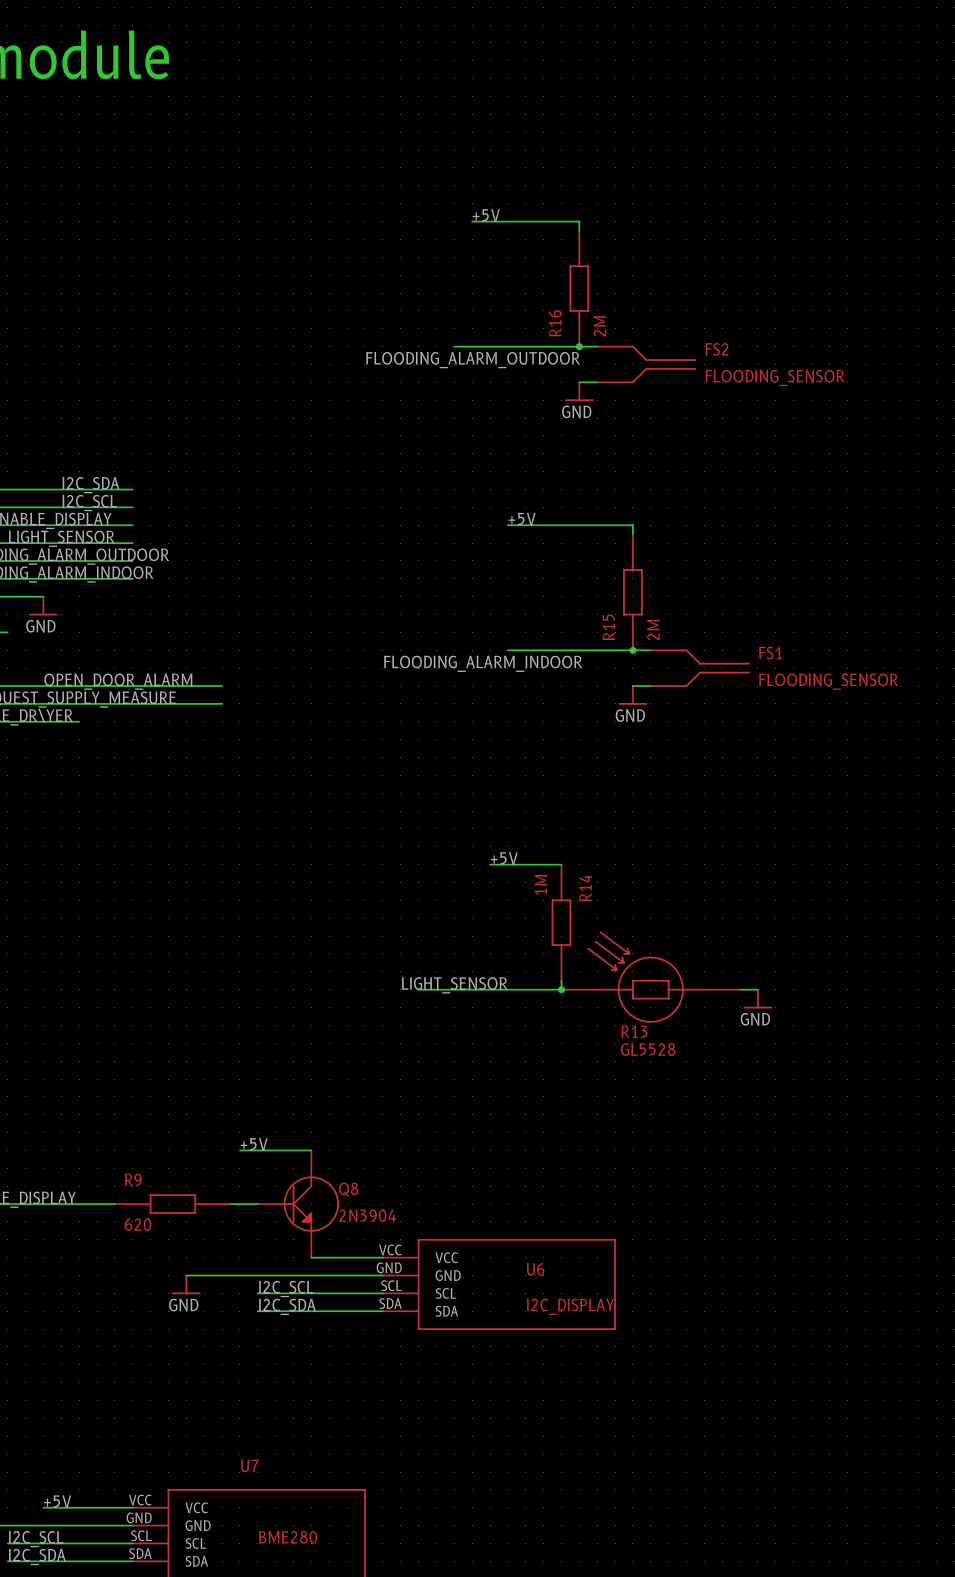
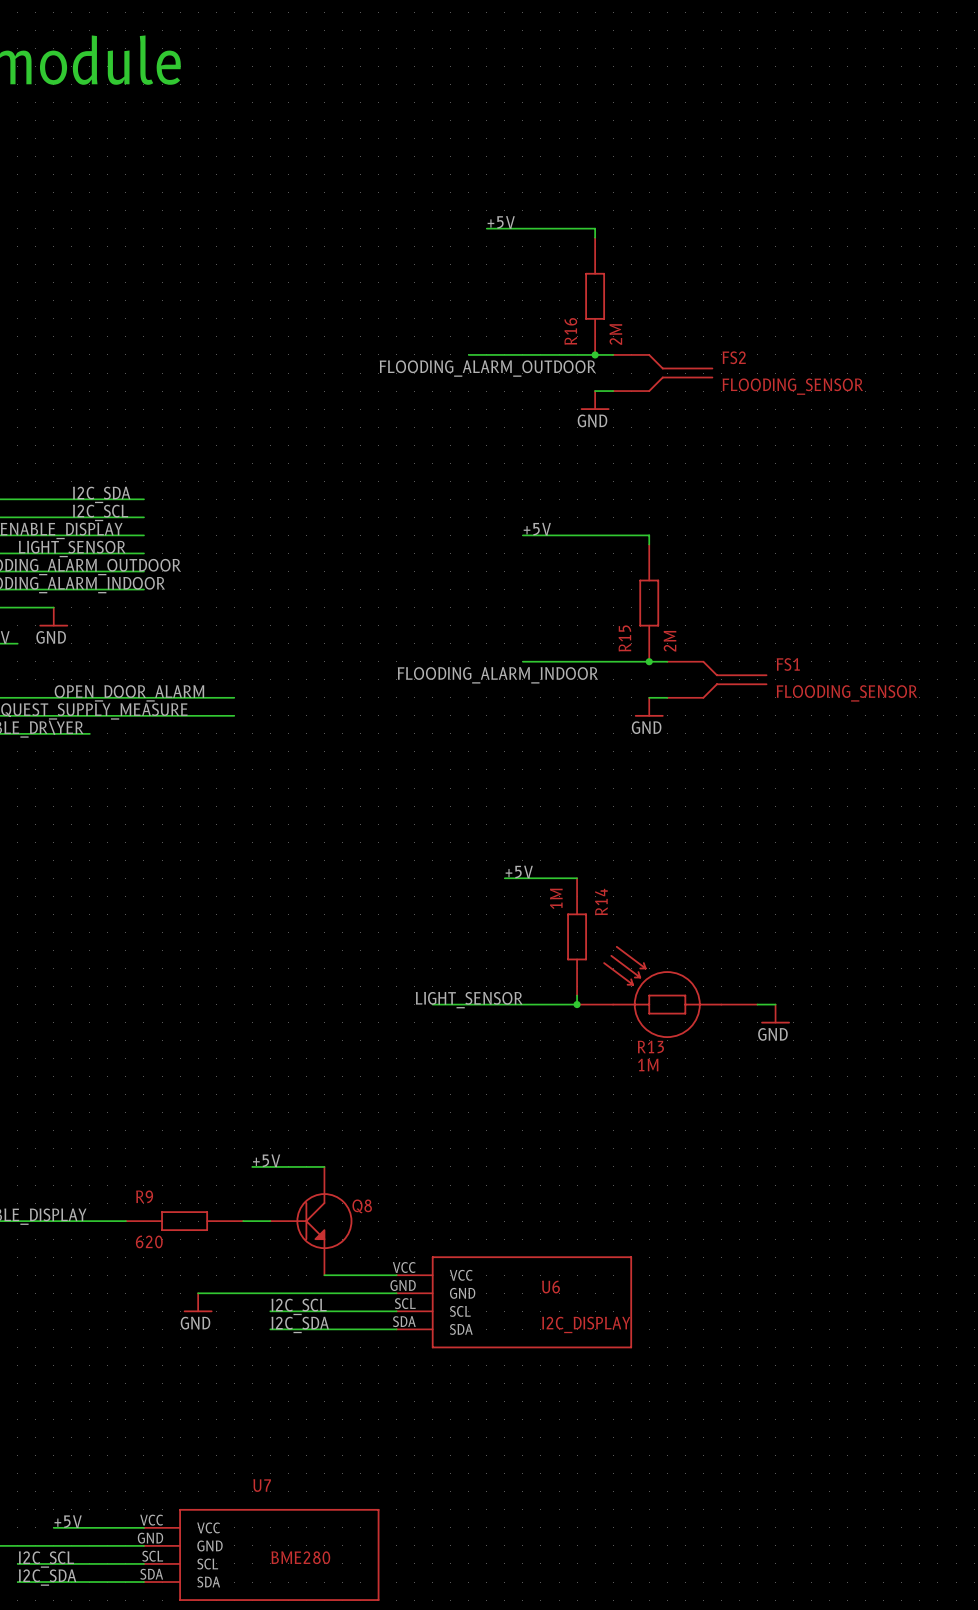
R13 value: GL5528 (648, 1049) -> 1M (648, 1065)
Q8 value: 2N3904 (367, 1215) -> none

